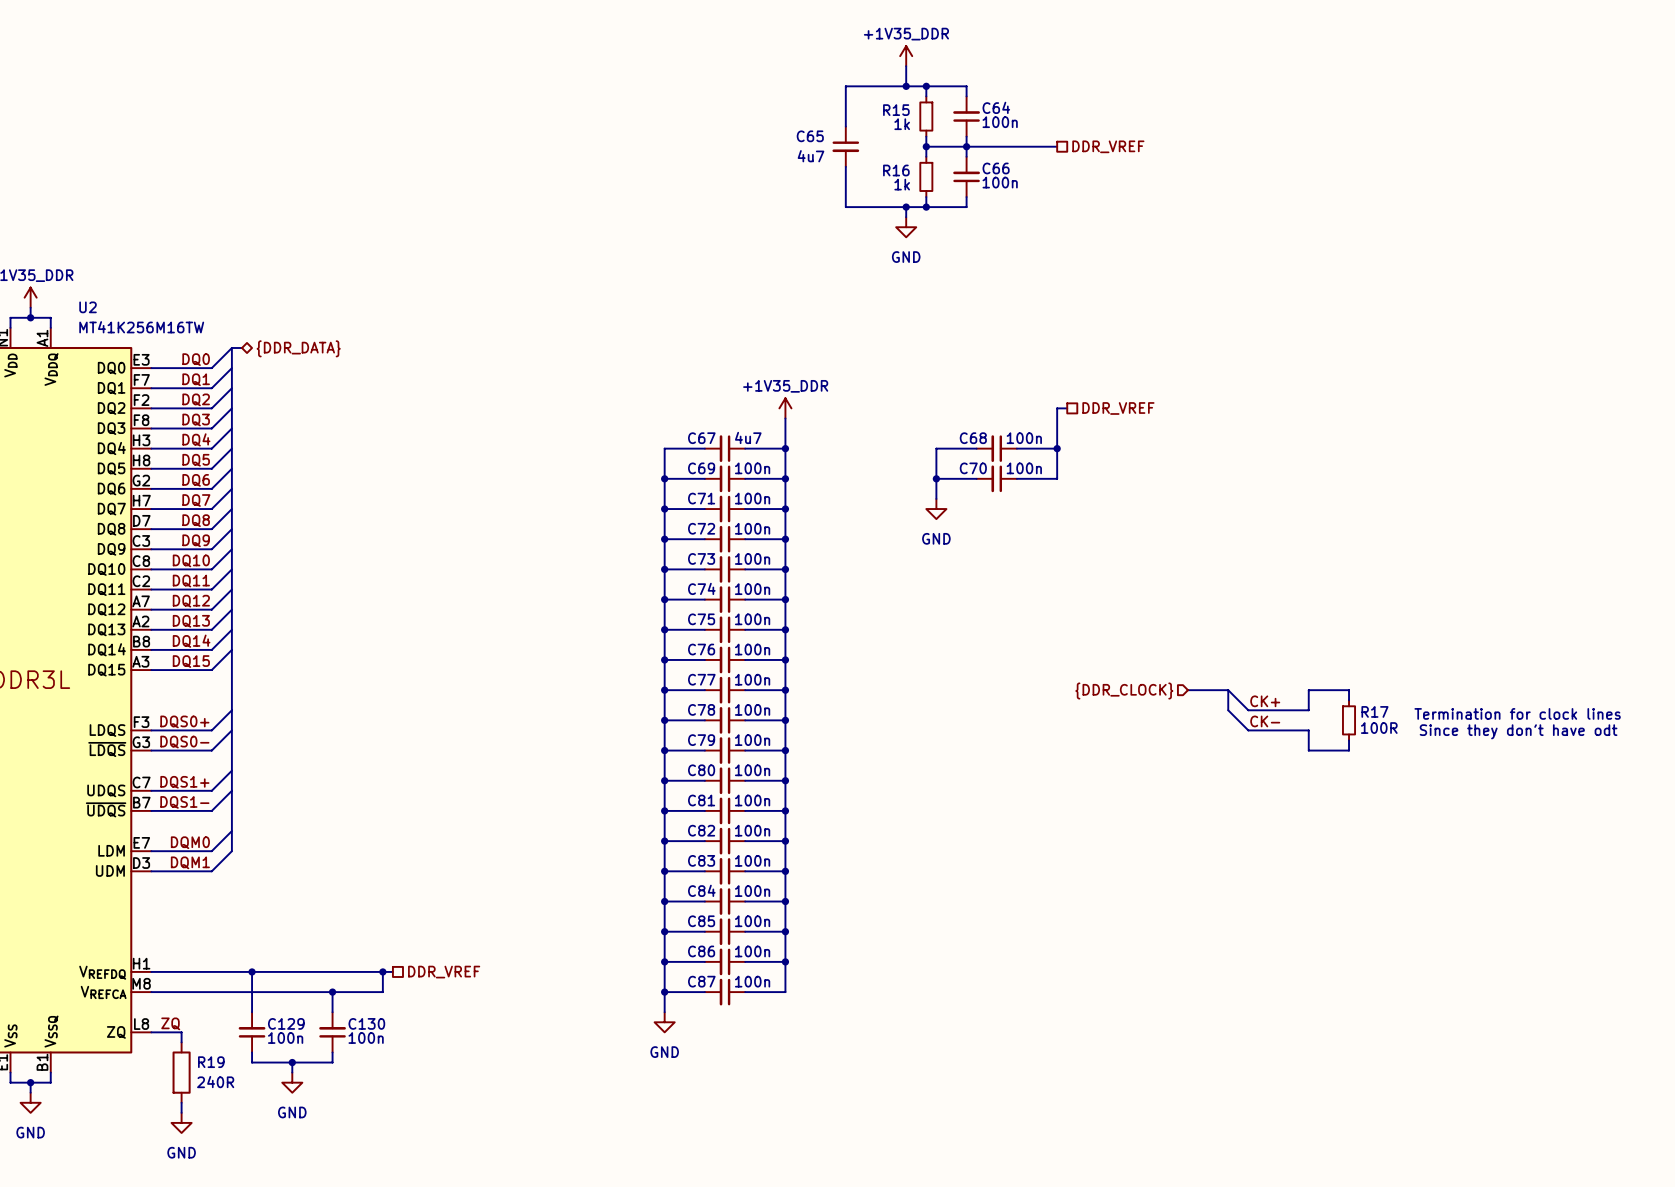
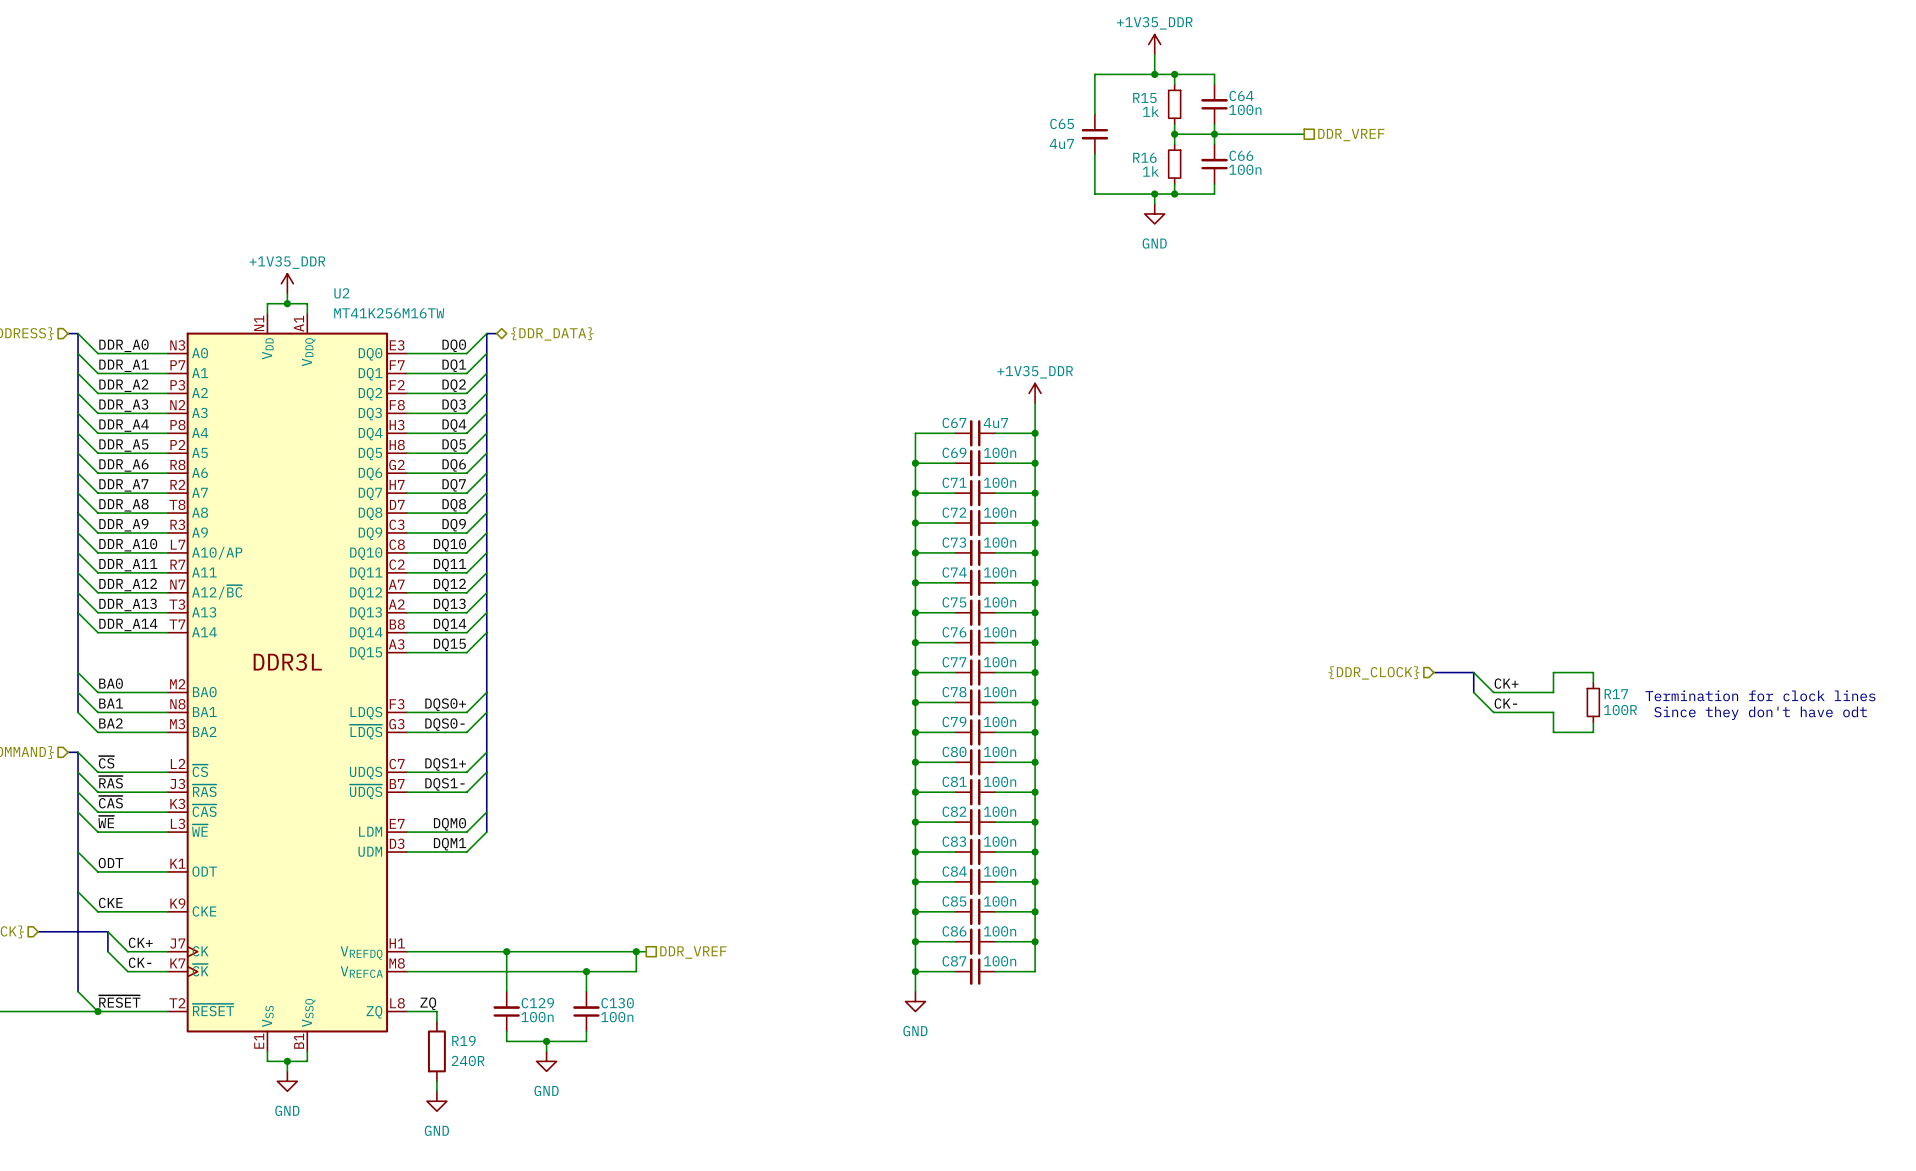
wire: (1067, 408) (1057, 408) (1057, 478) (1016, 478) -> none
hierarchical label: DDR_VREF (1118, 408) -> none
wire: (976, 448) (936, 448) (936, 498) -> none
C68: 100n (996, 448) -> none
wire: (1016, 448) (1057, 448) -> none
junction: (1057, 448) -> none
wire: (936, 478) (976, 478) -> none
junction: (936, 478) -> none
C70: 100n (996, 478) -> none
power symbol: GND (936, 509) -> none

